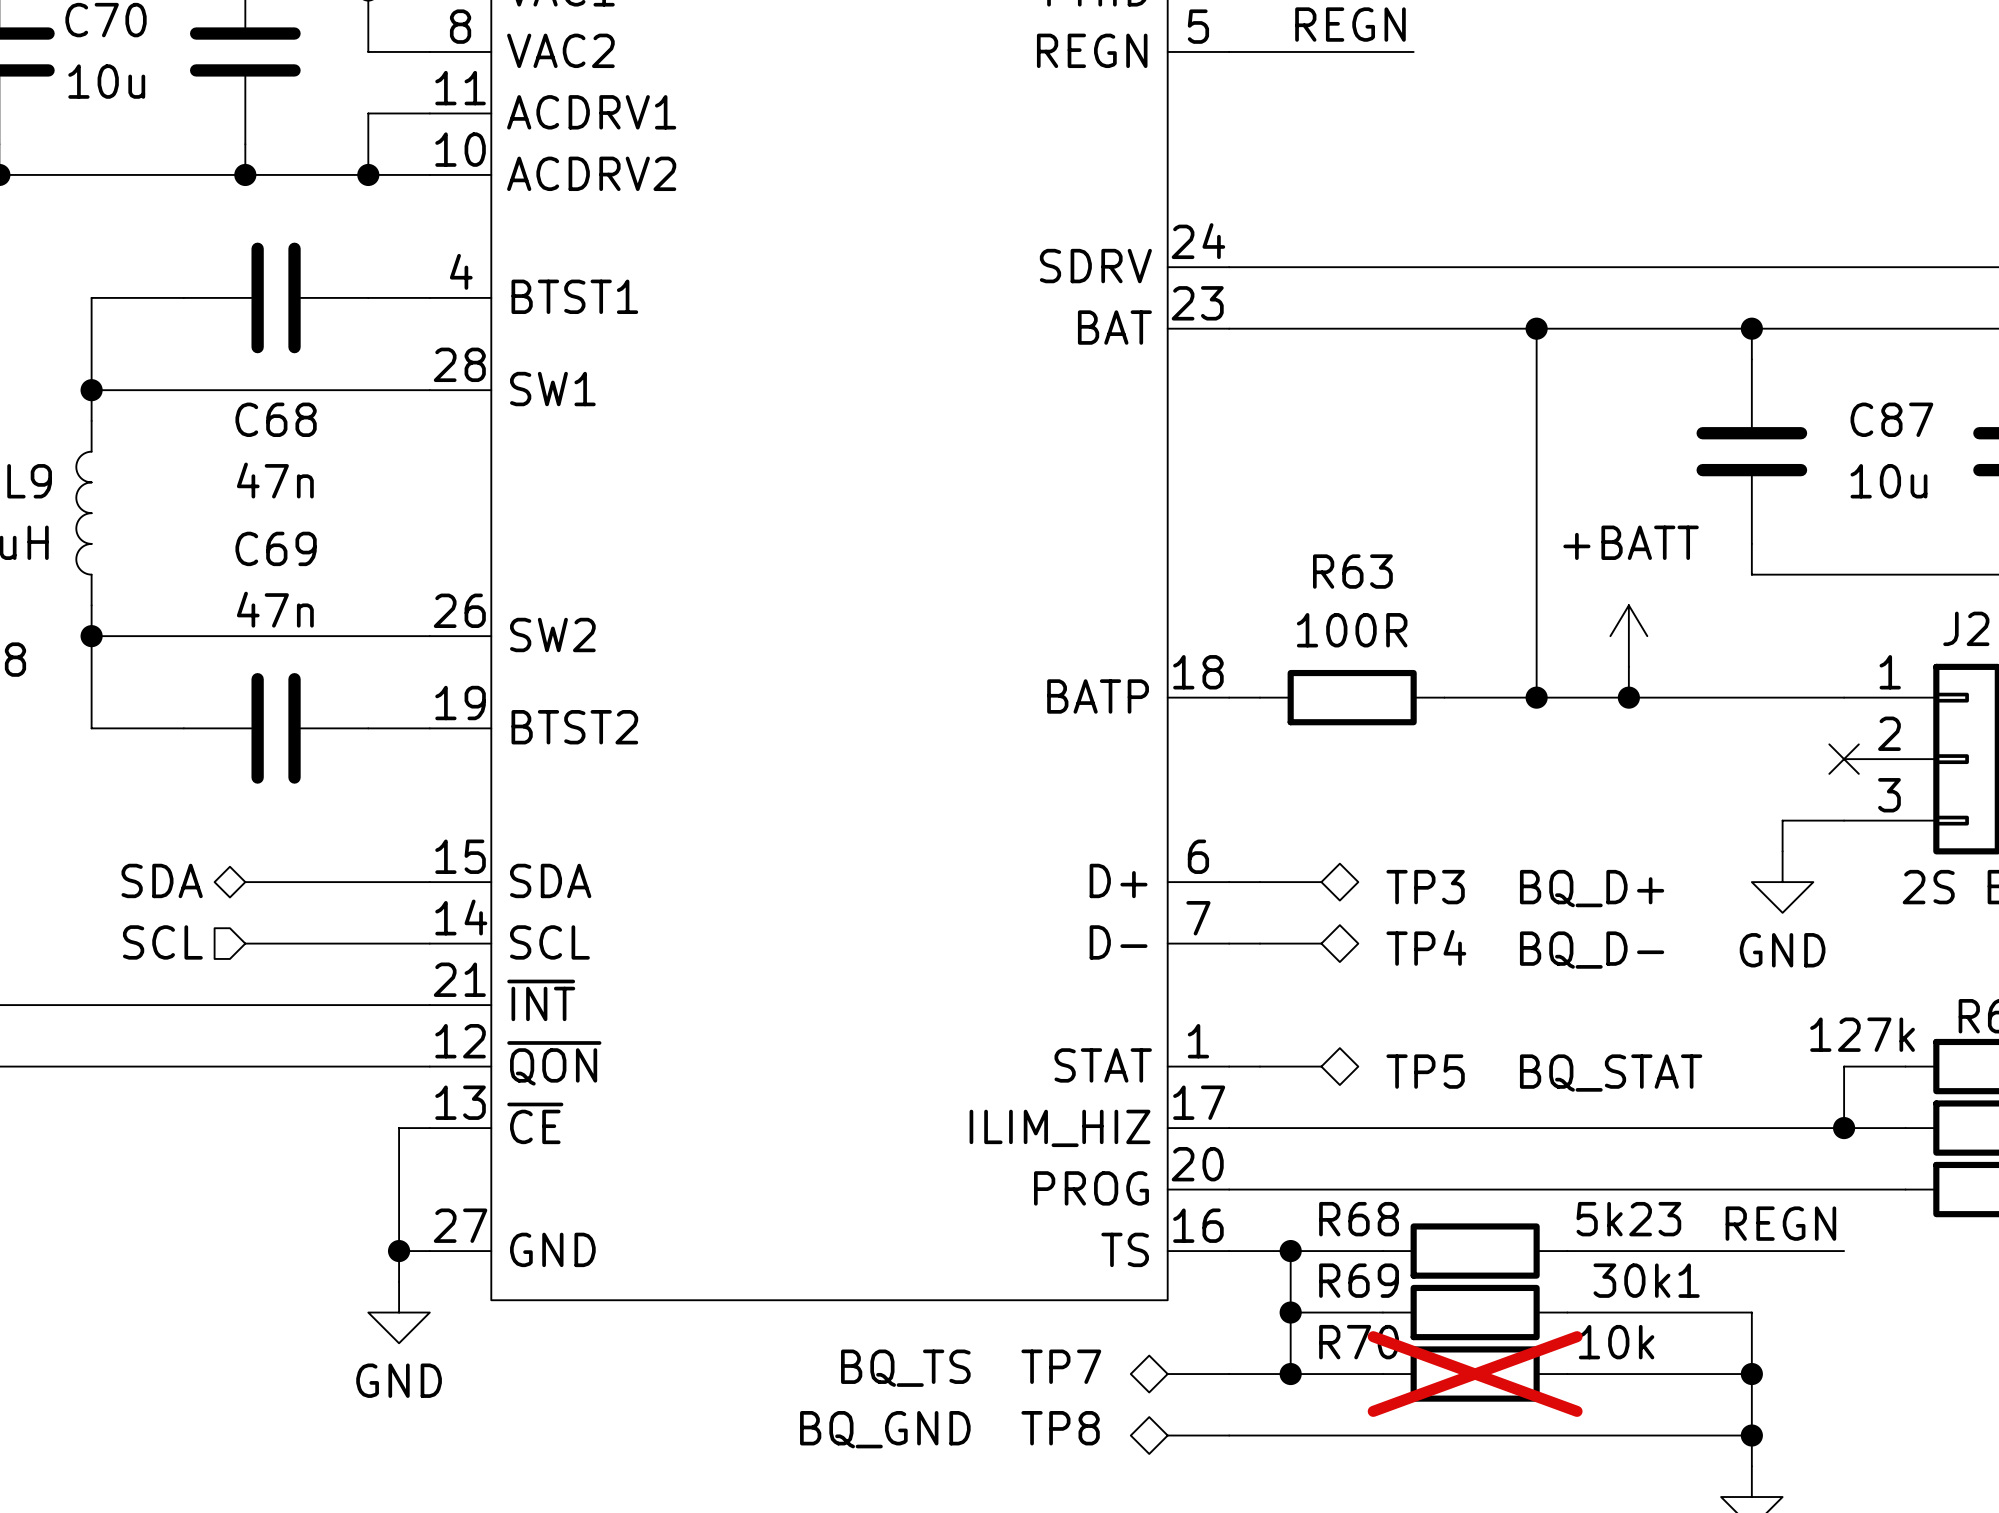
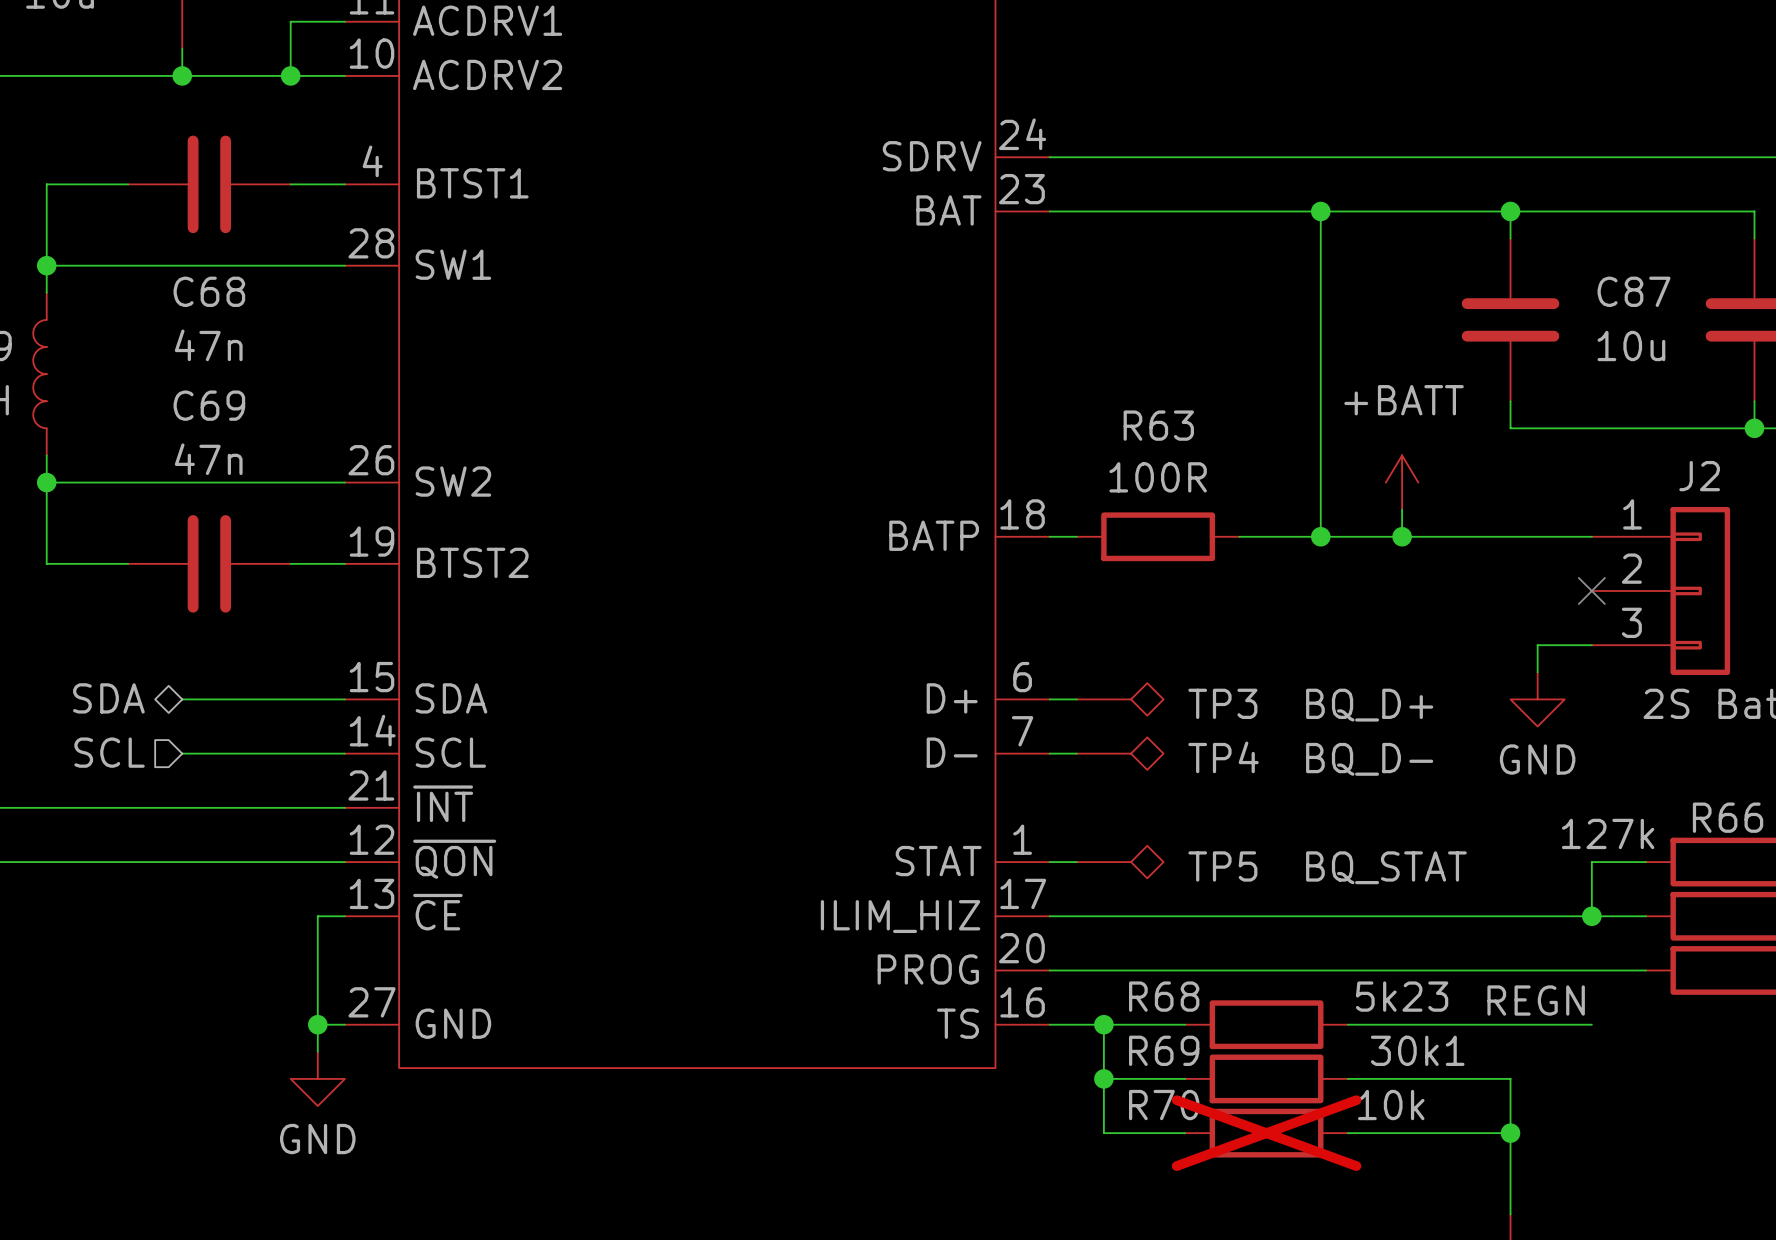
TP7: BQ_TS (1179, 1374) -> none
wire: (1229, 1374) (1290, 1374) -> none
junction: (1290, 1374) -> none
TP8: BQ_GND (1179, 1435) -> none
wire: (1229, 1435) (1751, 1435) -> none
junction: (1751, 1435) -> none

